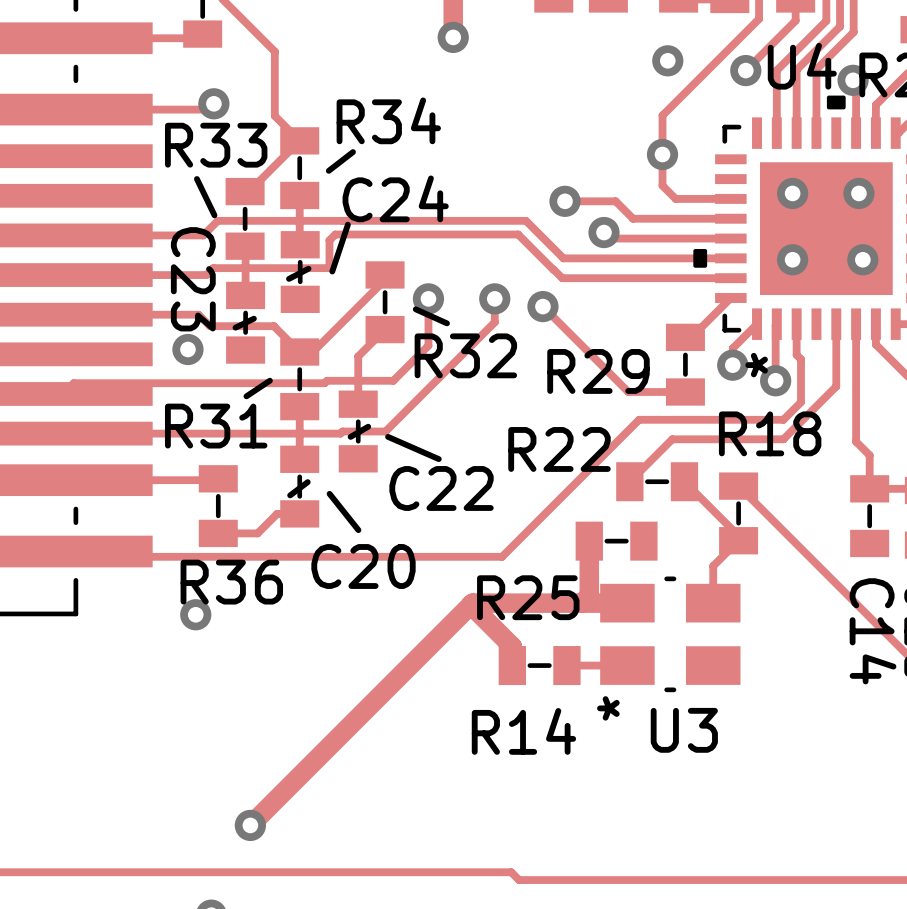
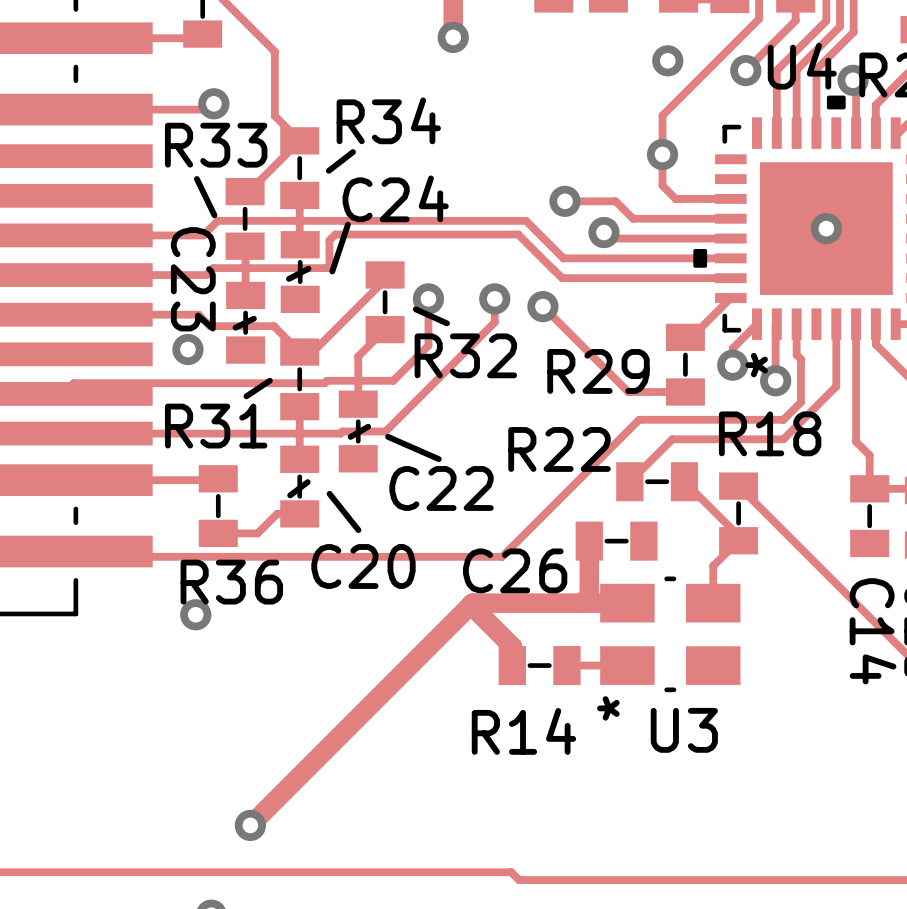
via: (792, 193) -> none
via: (858, 193) -> none
via: none -> (826, 228)
via: (792, 259) -> none
via: (862, 259) -> none
R25 name: R25 (528, 597) -> C26 (515, 570)

